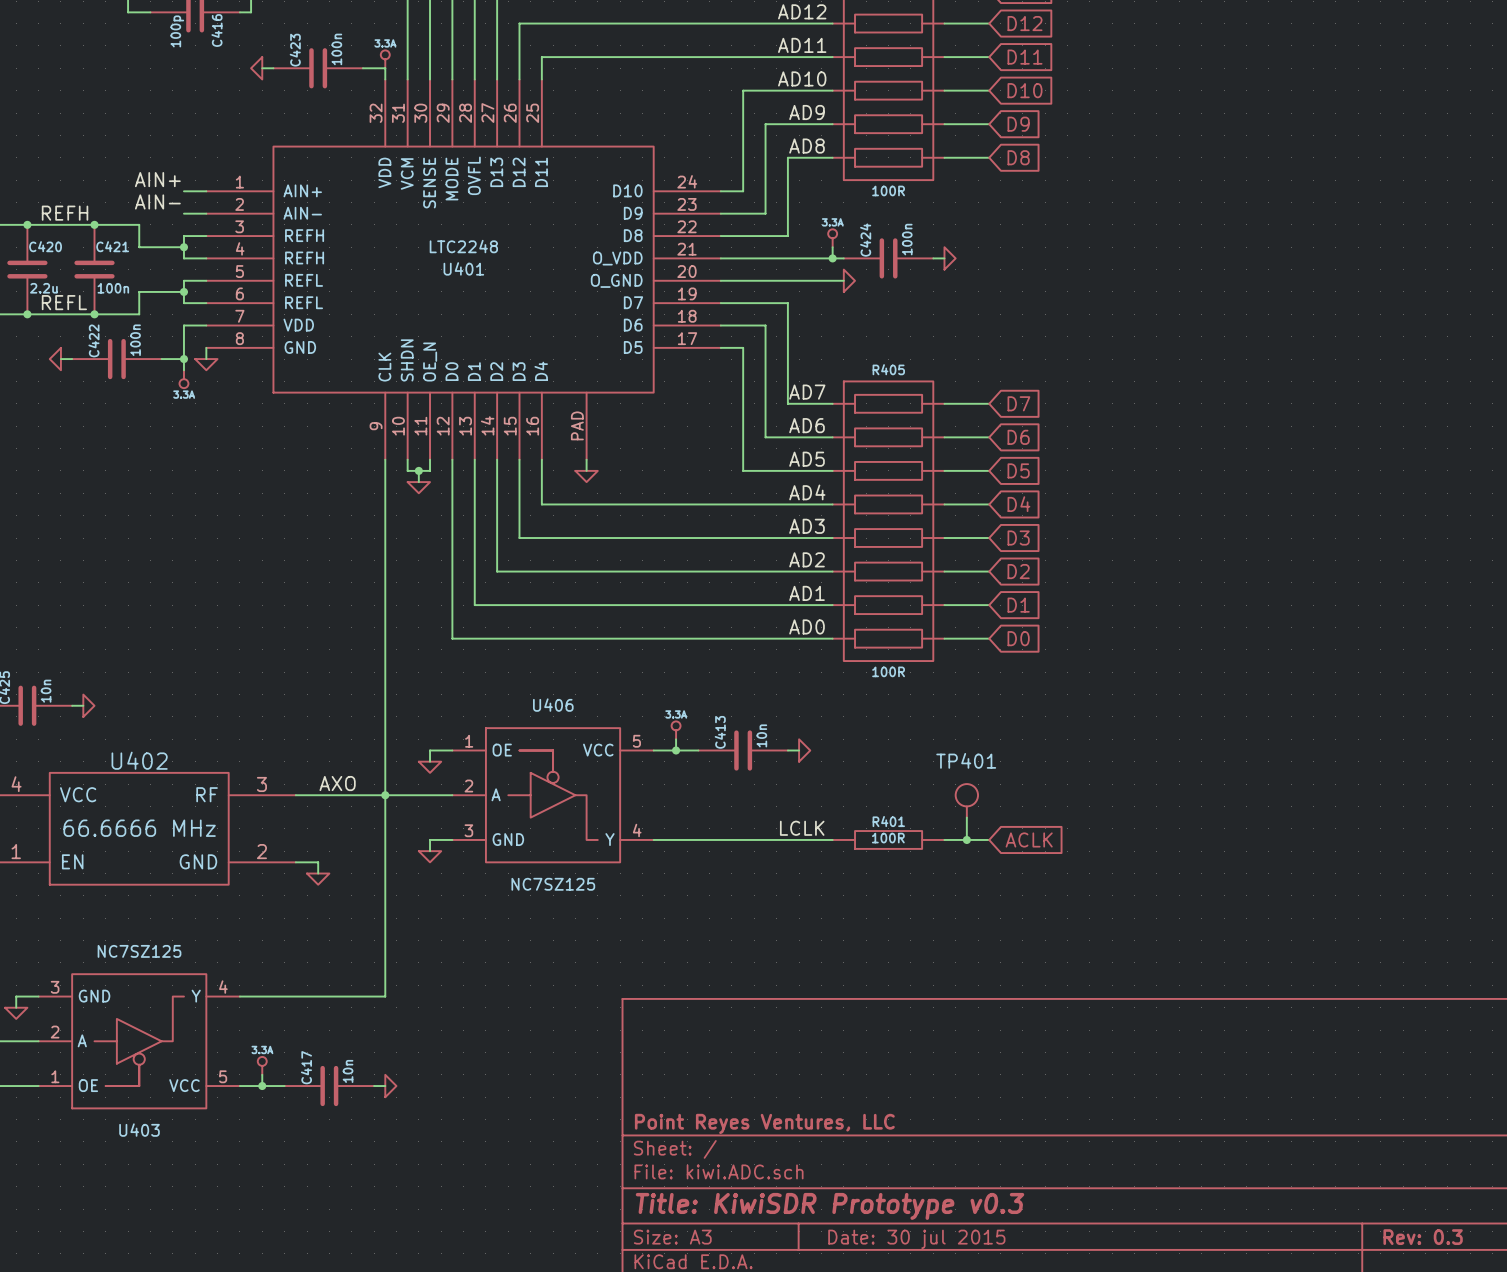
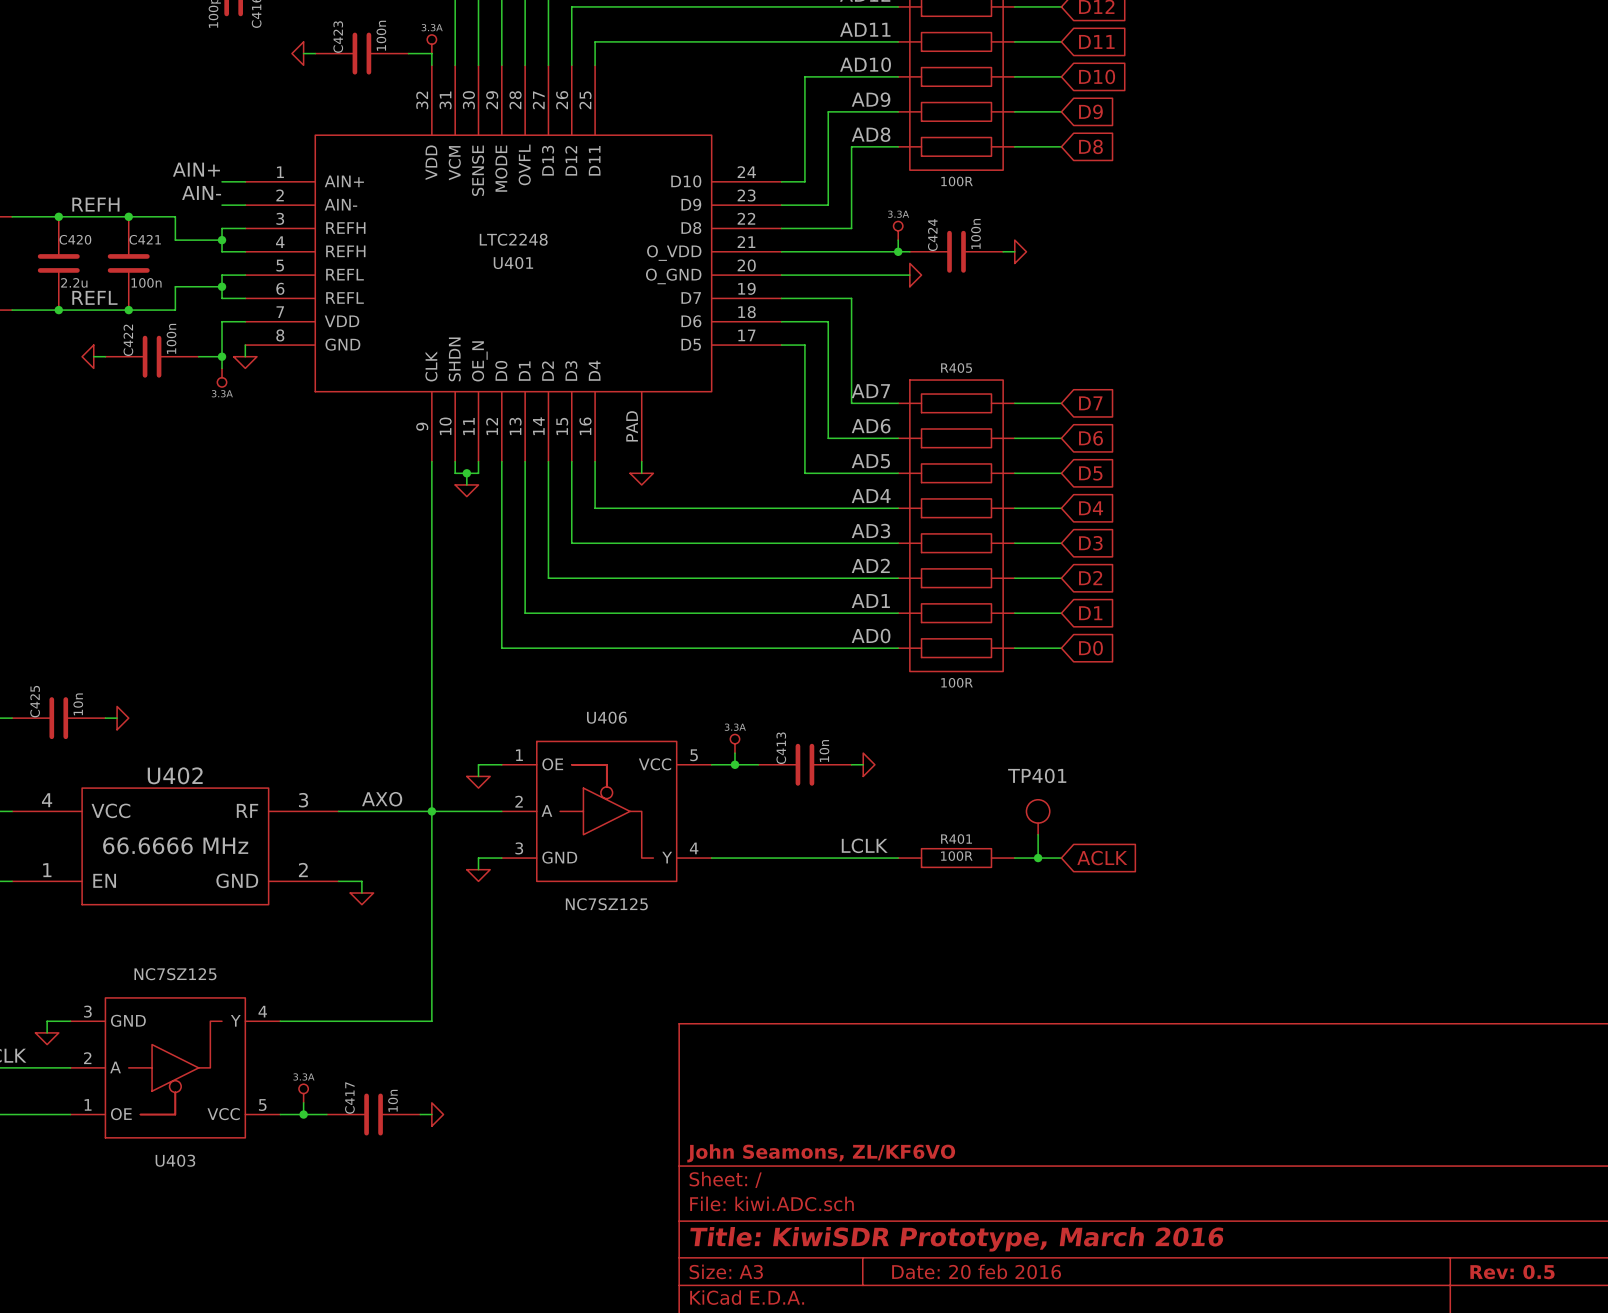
title block: Point Reyes Ventures, LLC (764, 1123) -> John Seamons, ZL/KF6VO (821, 1153)
title block: Title: KiwiSDR Prototype v0.3 (830, 1206) -> Title: KiwiSDR Prototype, March 2016 (956, 1239)
title block: Rev: 0.3 (1423, 1237) -> Rev: 0.5 (1512, 1272)
title block: Date: 30 jul 2015 (916, 1239) -> Date: 20 feb 2016 (976, 1271)

